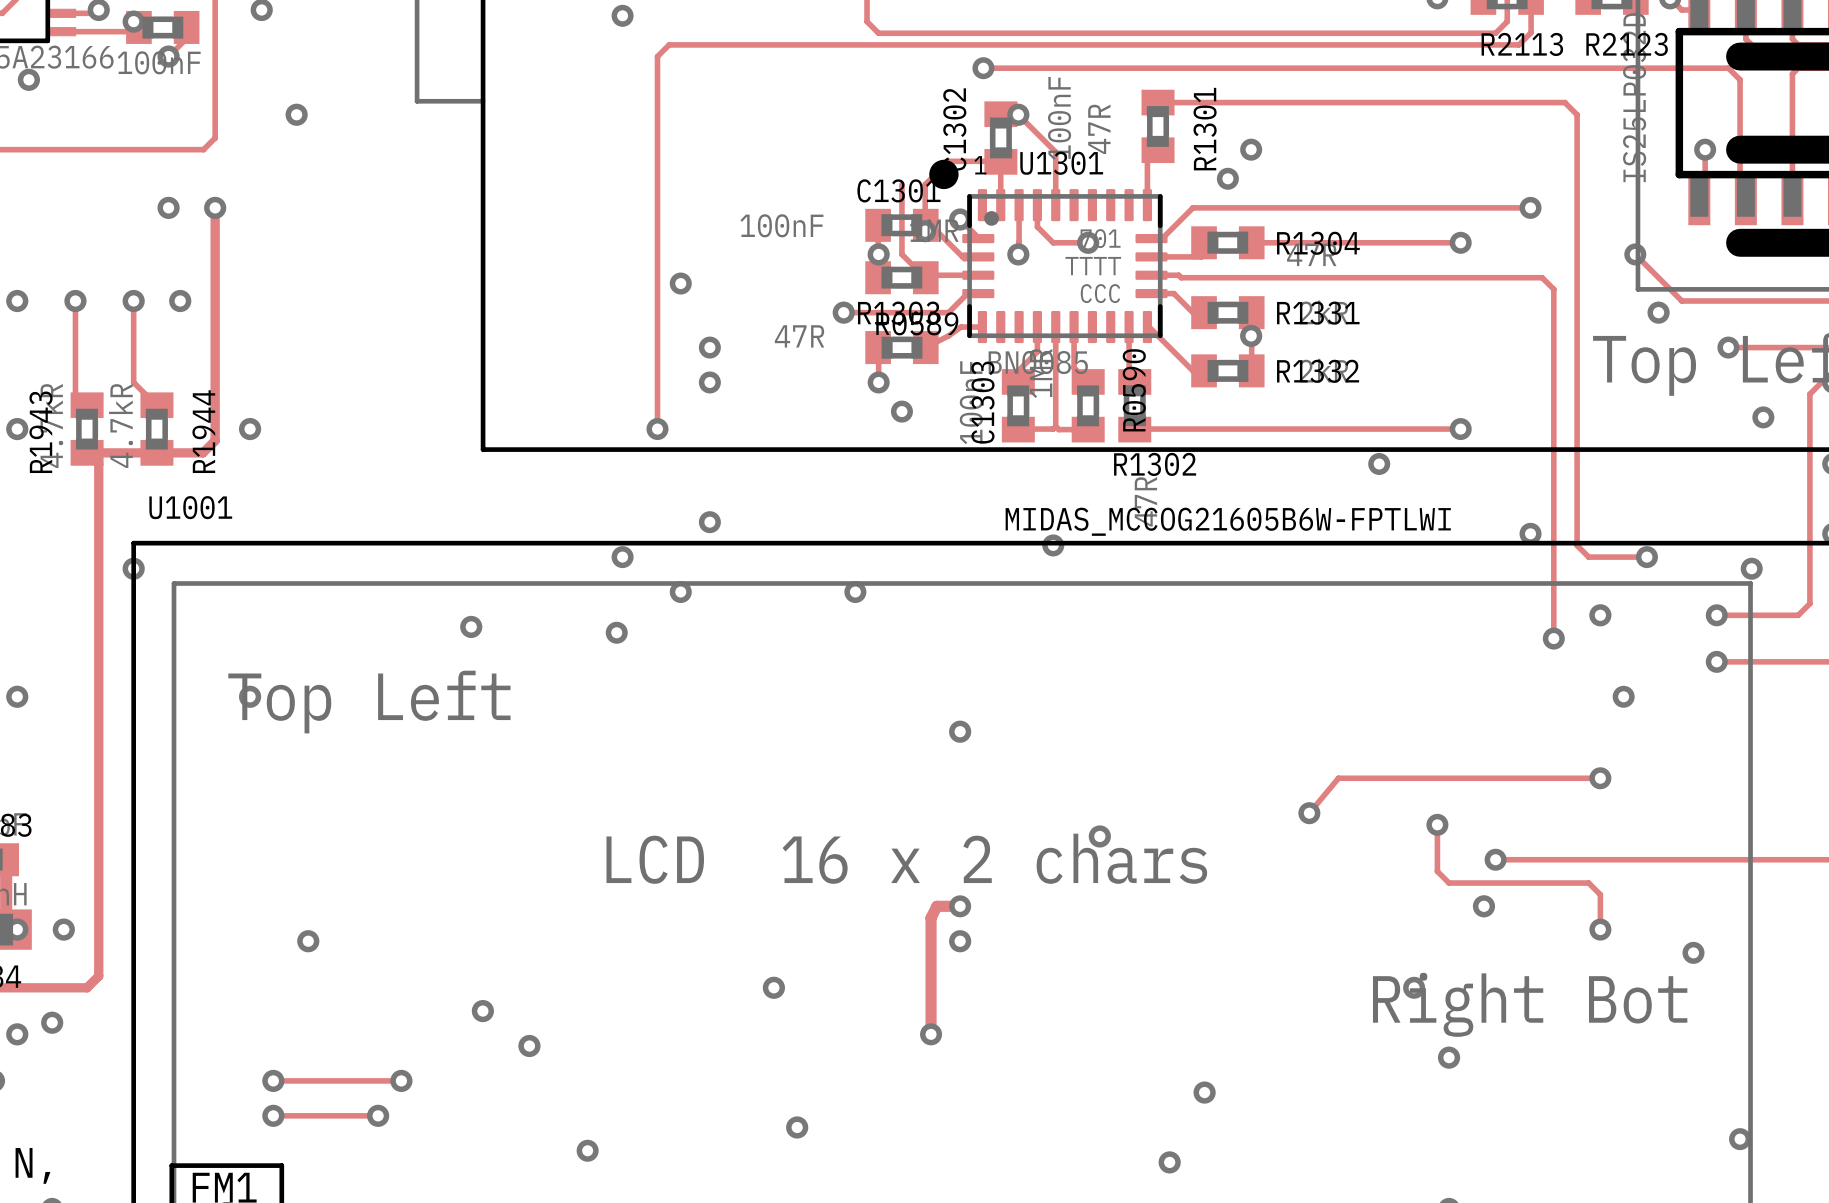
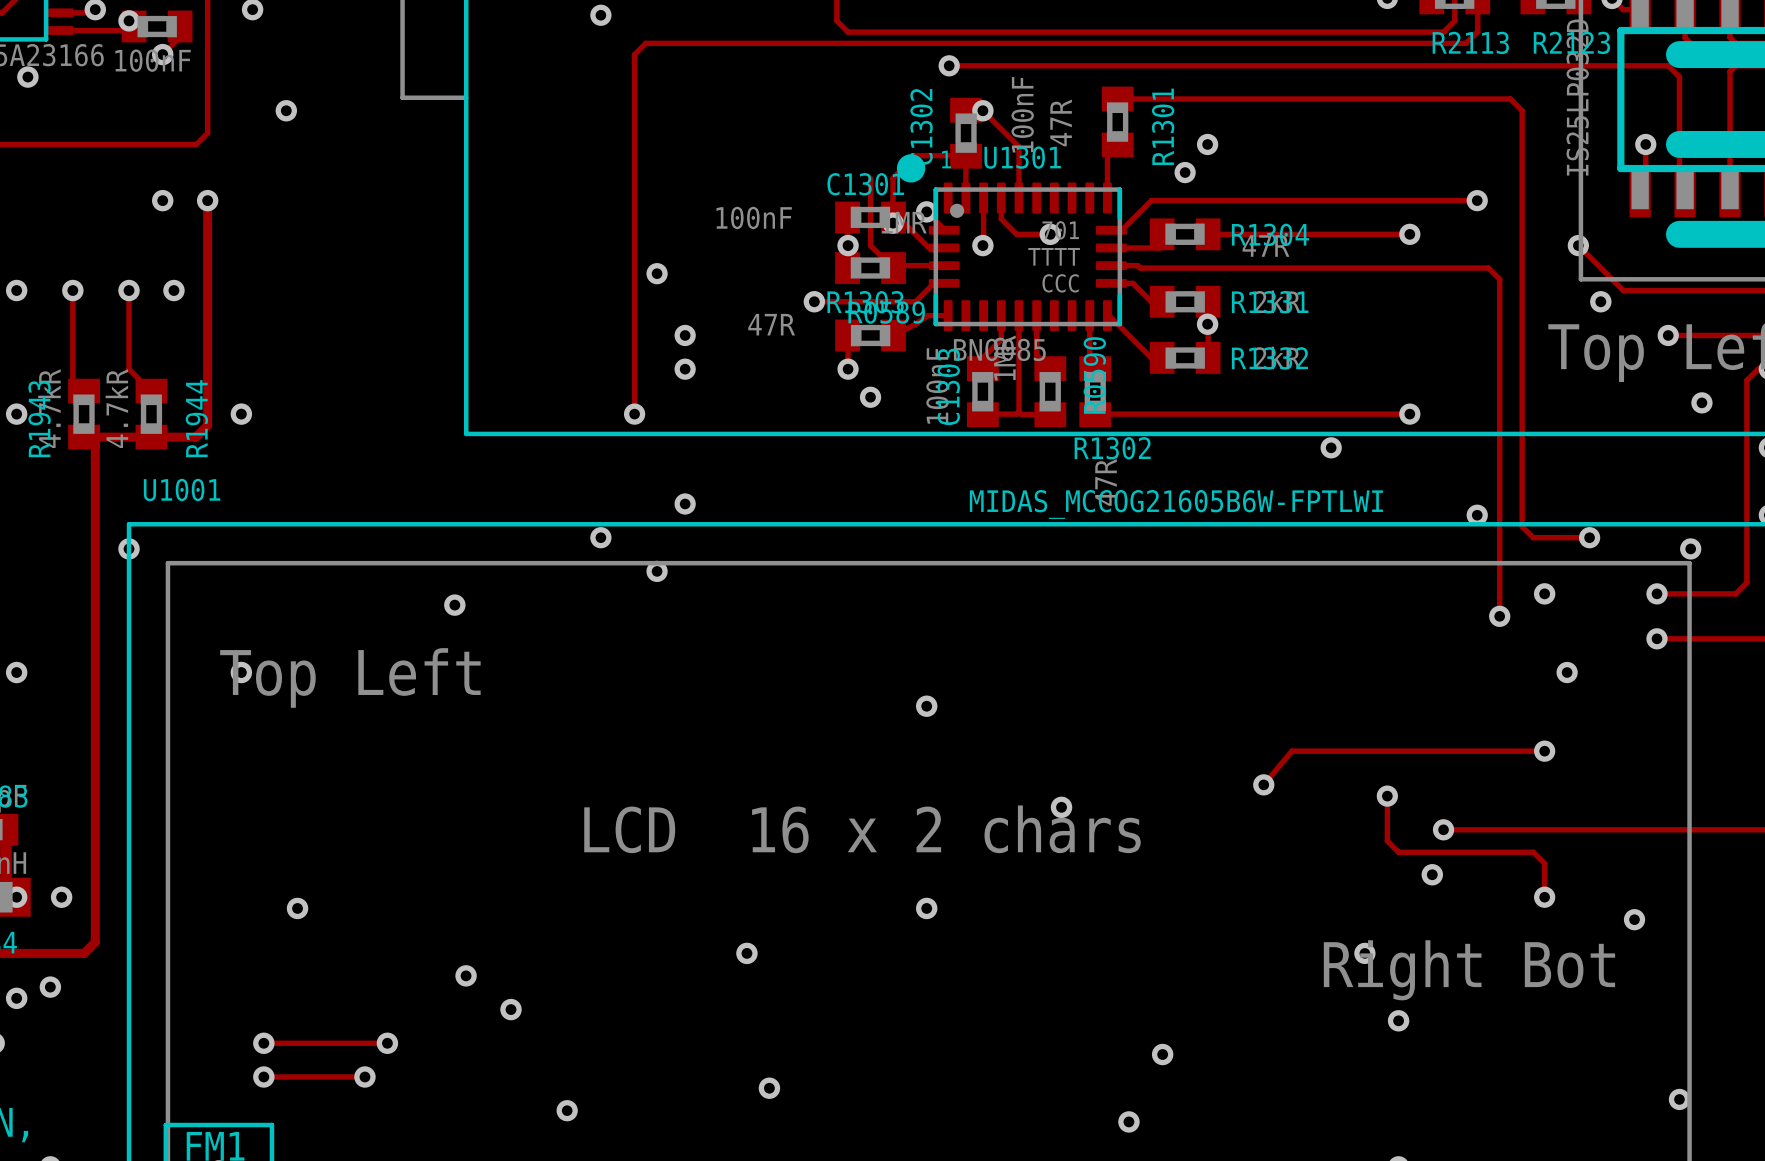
via: (1053, 545) -> none
via: (855, 592) -> none
via: (616, 632) -> none
track: (960, 906) (936, 906) (931, 917) (931, 1034) -> none
via: (960, 906) -> none
via: (931, 1034) -> none

